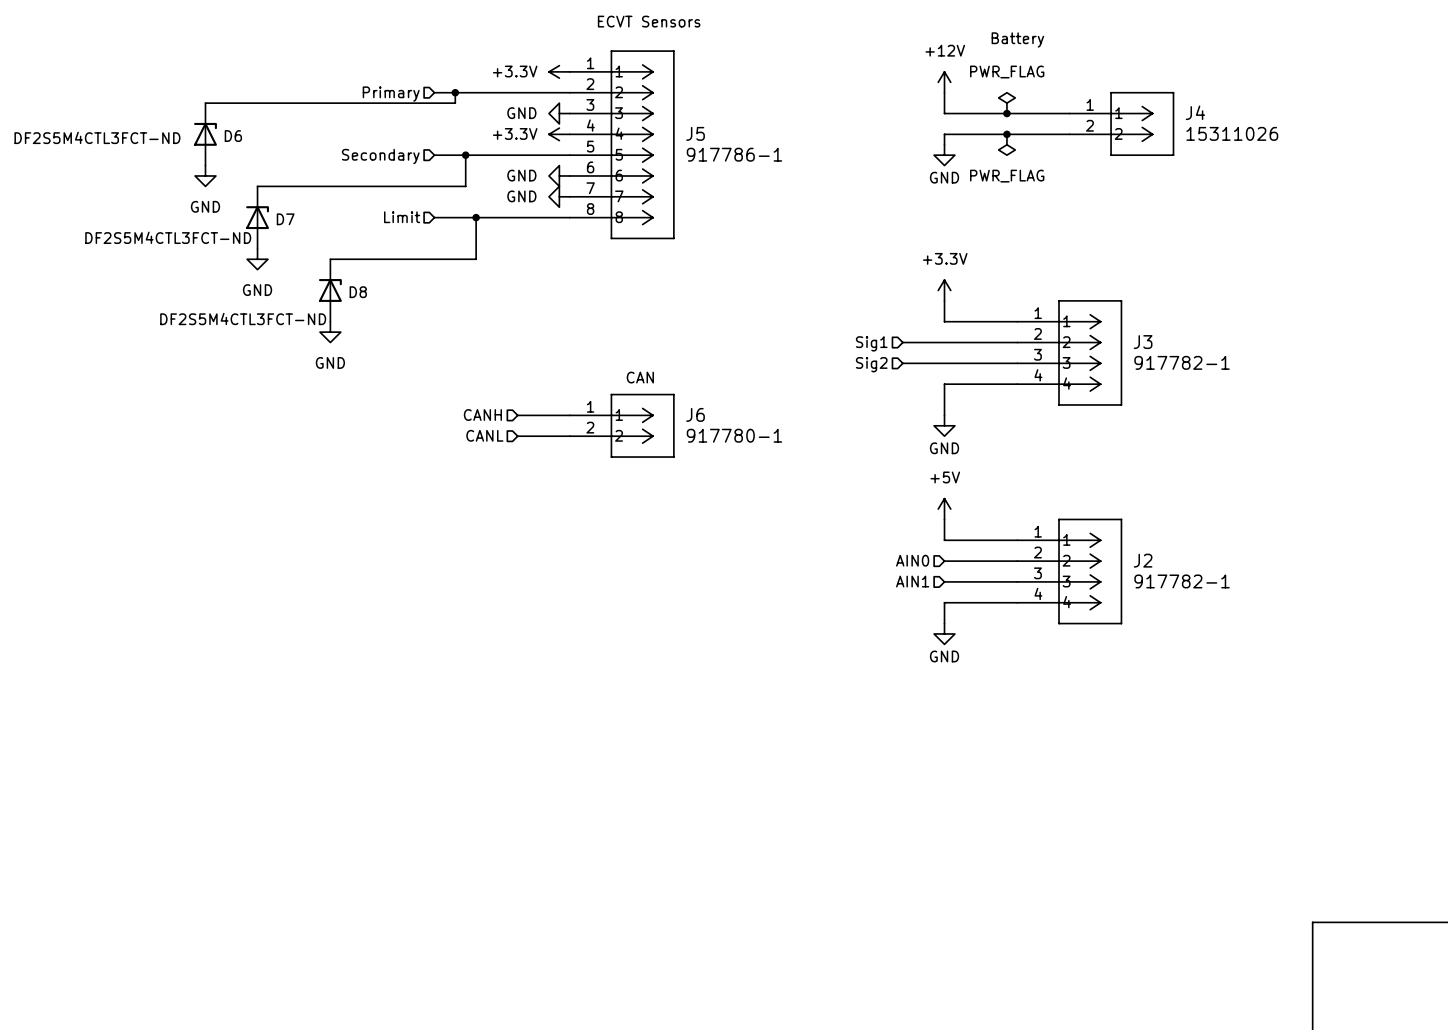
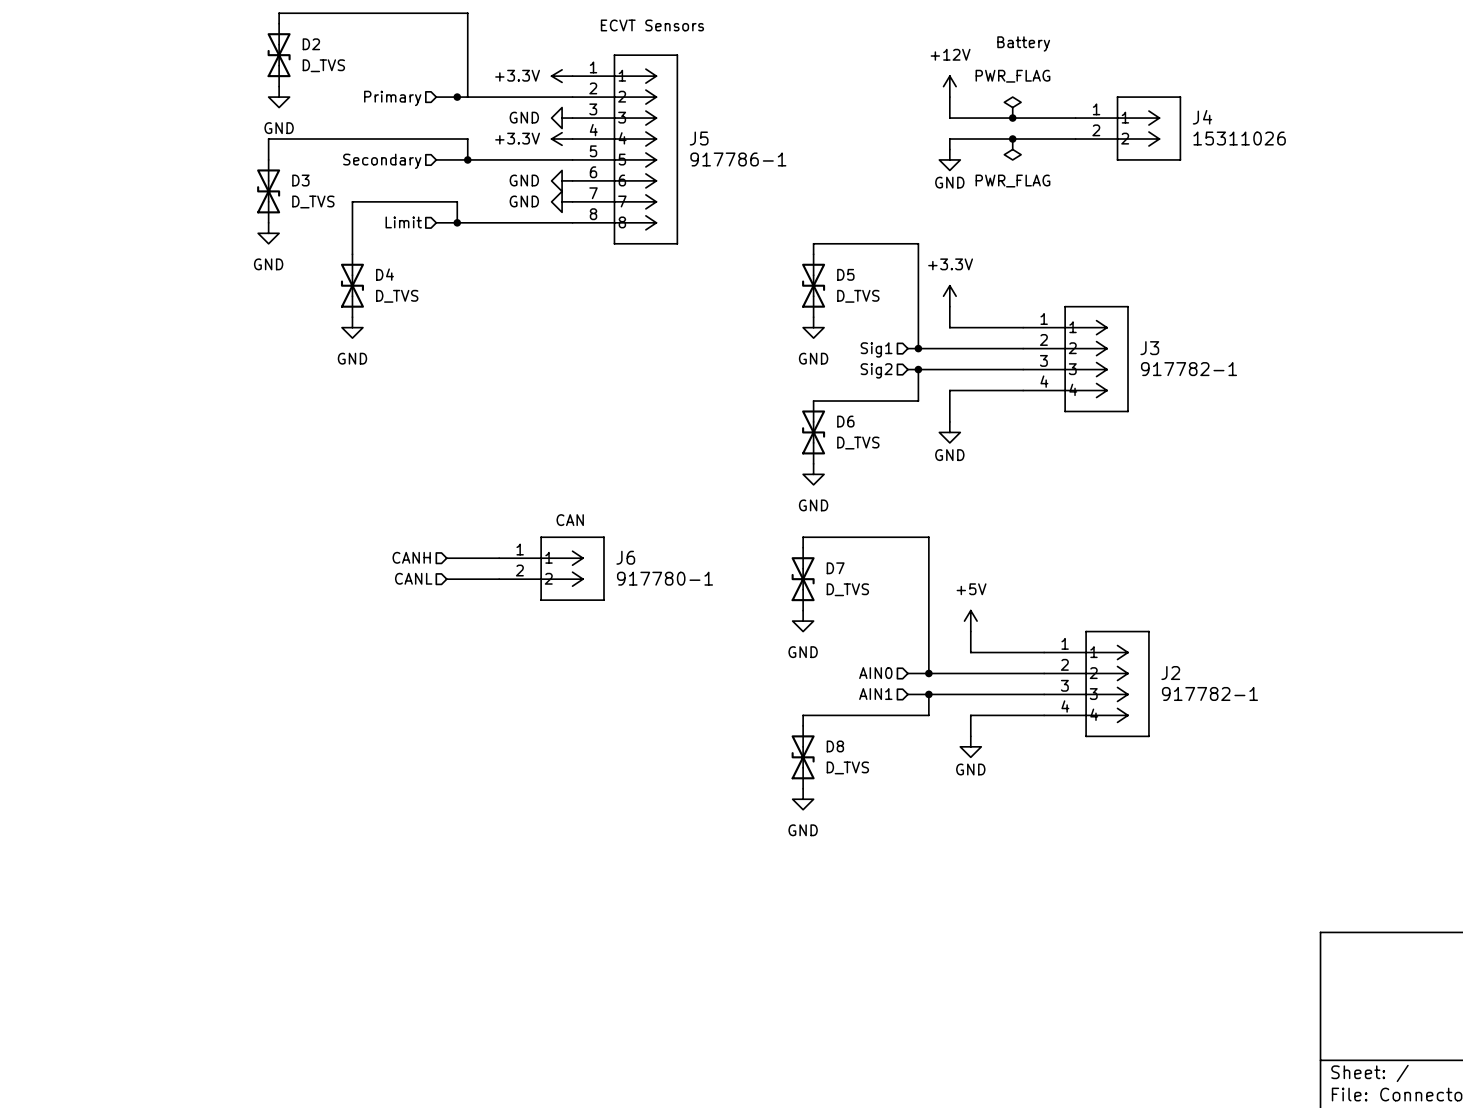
wire: none -> (279, 23) (279, 13) (467, 13) (467, 97)
D2: none -> D_TVS (279, 55)
power symbol: none -> GND (279, 97)
wire: (455, 92) (455, 103) (205, 103) -> none
D6 symbol: [194, 103, 217, 166] -> [802, 401, 826, 464]
D6 value: DF2S5M4CTL3FCT-ND (97, 137) -> D_TVS (858, 443)
wire: (465, 155) (465, 186) (257, 186) -> (467, 159) (467, 139) (268, 139) (268, 159)
power symbol: GND (205, 175) -> none
D7 symbol: [246, 186, 269, 249] -> [791, 547, 815, 611]
D3: none -> D_TVS (268, 191)
wire: none -> (457, 222) (457, 201) (352, 201) (352, 254)
wire: (476, 217) (476, 259) (330, 259) -> none
junction position: (476, 217) -> (457, 222)
D7 value: DF2S5M4CTL3FCT-ND (168, 237) -> D_TVS (847, 589)
wire: none -> (813, 254) (813, 243) (918, 243) (918, 348)
power symbol position: GND (257, 259) -> GND (268, 233)
D8 symbol: [318, 259, 342, 322] -> [791, 725, 815, 789]
D4: none -> D_TVS (352, 285)
D5: none -> D_TVS (813, 285)
D8 value: DF2S5M4CTL3FCT-ND (243, 318) -> D_TVS (847, 767)
power symbol: none -> GND (813, 327)
power symbol position: GND (330, 332) -> GND (352, 327)
junction: none -> (918, 348)
wire: none -> (918, 369) (918, 401) (813, 401)
junction: none -> (918, 369)
text position: CAN (640, 377) -> CAN (570, 520)
hierarchical label position: CANH (482, 415) -> CANH (411, 557)
wire: (517, 415) (569, 415) -> (446, 558) (499, 558)
J6 position: (622, 425) -> (551, 568)
hierarchical label position: CANL (484, 435) -> CANL (413, 578)
wire: (517, 436) (569, 436) -> (446, 579) (499, 579)
power symbol: none -> GND (813, 474)
power symbol position: +5V (944, 509) -> +5V (970, 621)
wire: (944, 519) (944, 540) (1017, 540) -> (970, 631) (970, 652) (1044, 652)
wire: none -> (803, 547) (803, 537) (928, 537) (928, 673)
hierarchical label position: AIN0 (912, 560) -> AIN0 (875, 673)
wire: (944, 561) (1017, 561) -> none
J2 position: (1069, 571) -> (1096, 683)
hierarchical label position: AIN1 (912, 581) -> AIN1 (875, 694)
wire: (944, 581) (1017, 581) -> none
wire: (1017, 602) (944, 602) (944, 623) -> (1044, 715) (970, 715) (970, 736)
power symbol: none -> GND (803, 621)
power symbol: GND (944, 633) -> none
wire: none -> (907, 673) (1044, 673)
junction: none -> (928, 673)
wire: none -> (907, 694) (1044, 694)
wire: none -> (928, 694) (928, 715) (803, 715) (803, 725)
junction: none -> (928, 694)
power symbol: none -> GND (970, 746)
power symbol: none -> GND (803, 799)

